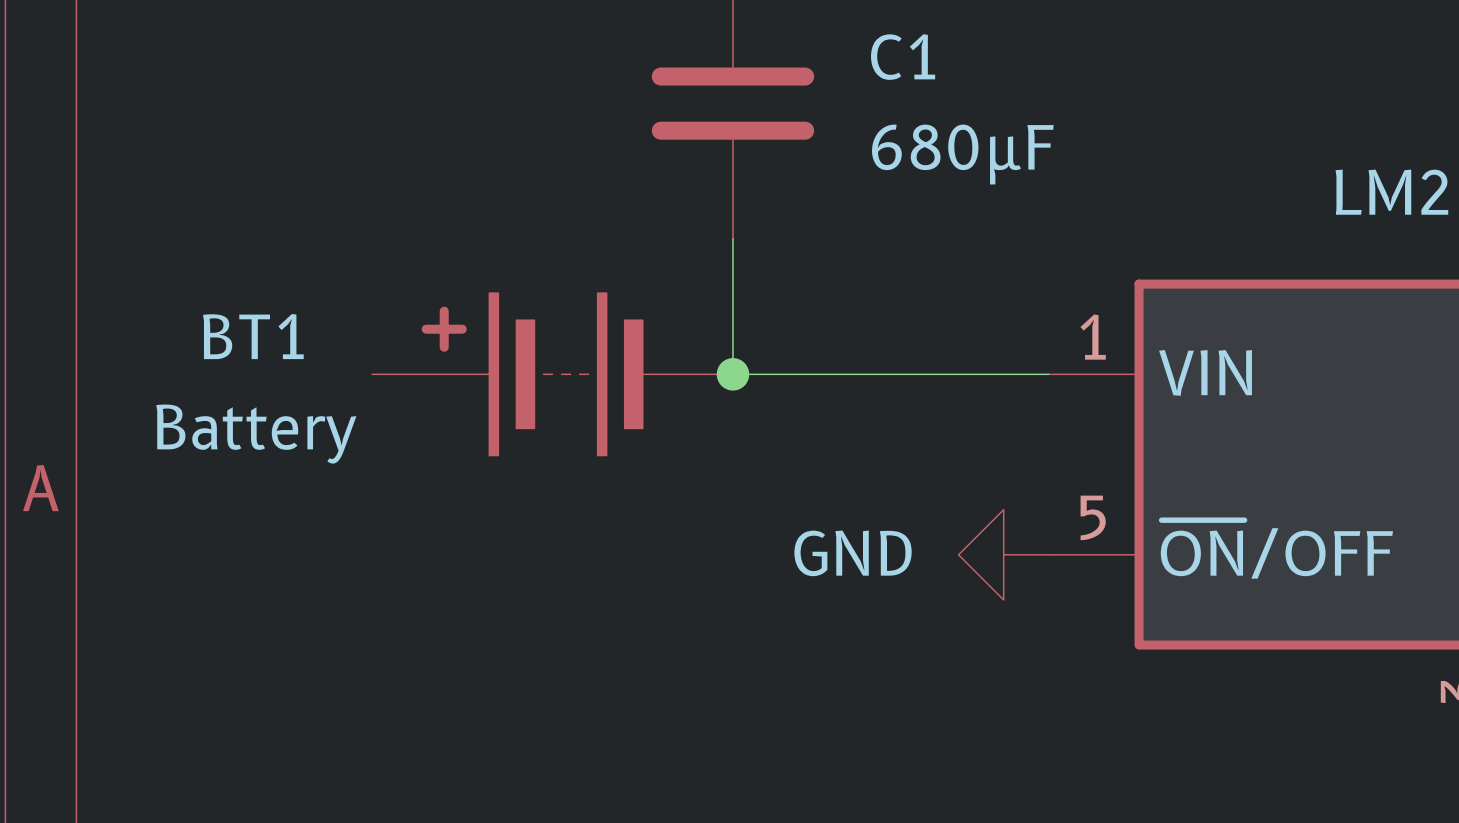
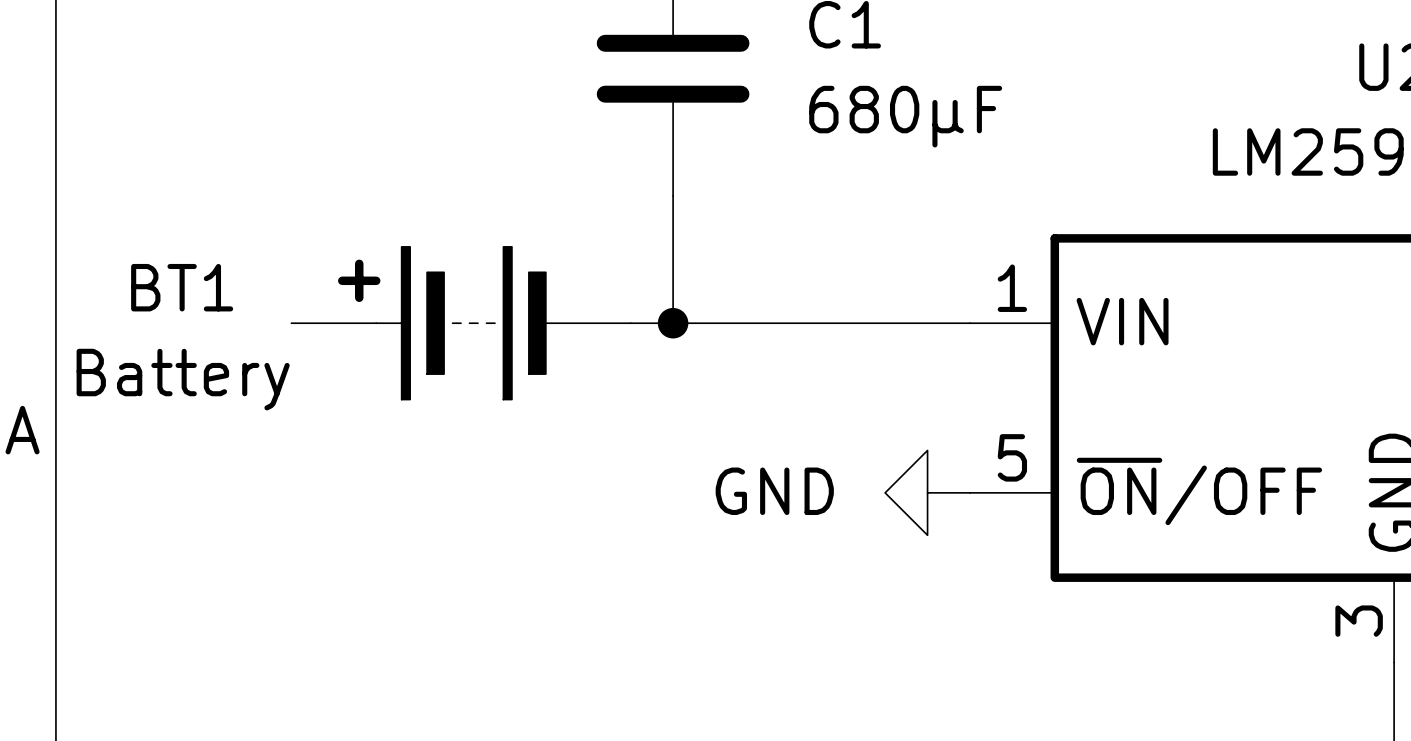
BT1 position: (552, 374) -> (461, 323)

